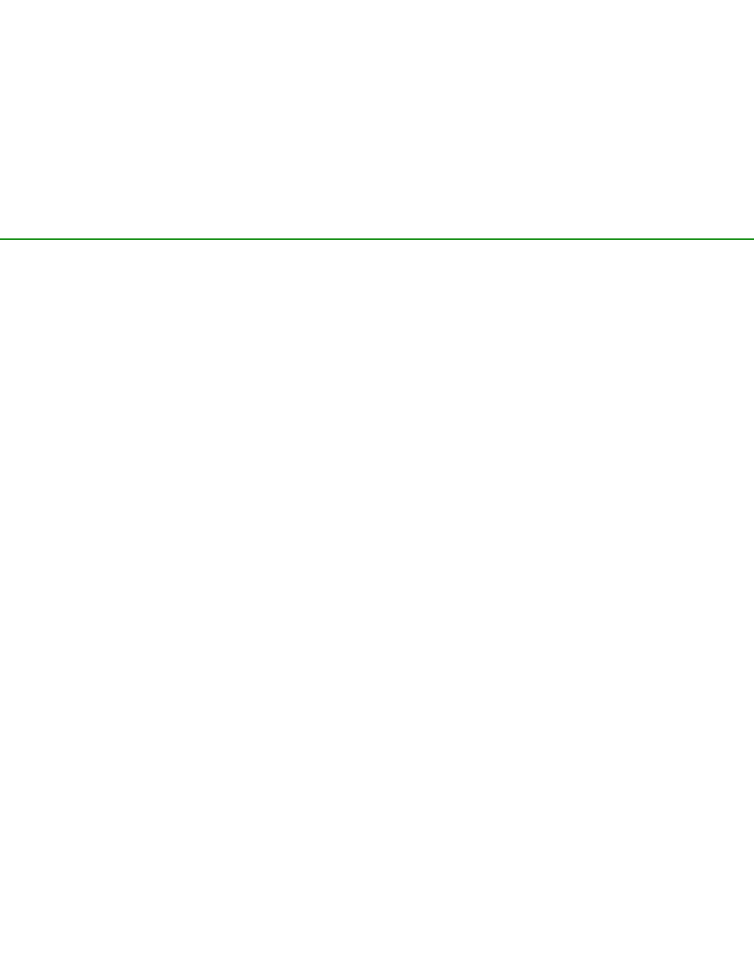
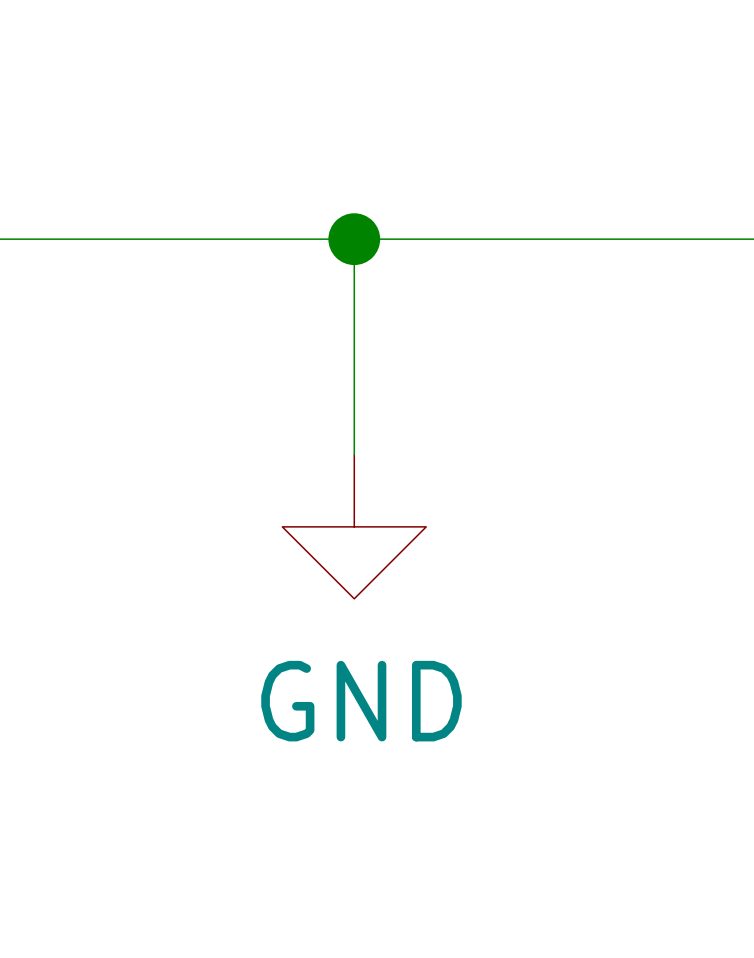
wire: none -> (354, 239) (354, 454)
junction: none -> (354, 239)
power symbol: none -> GND (354, 526)

